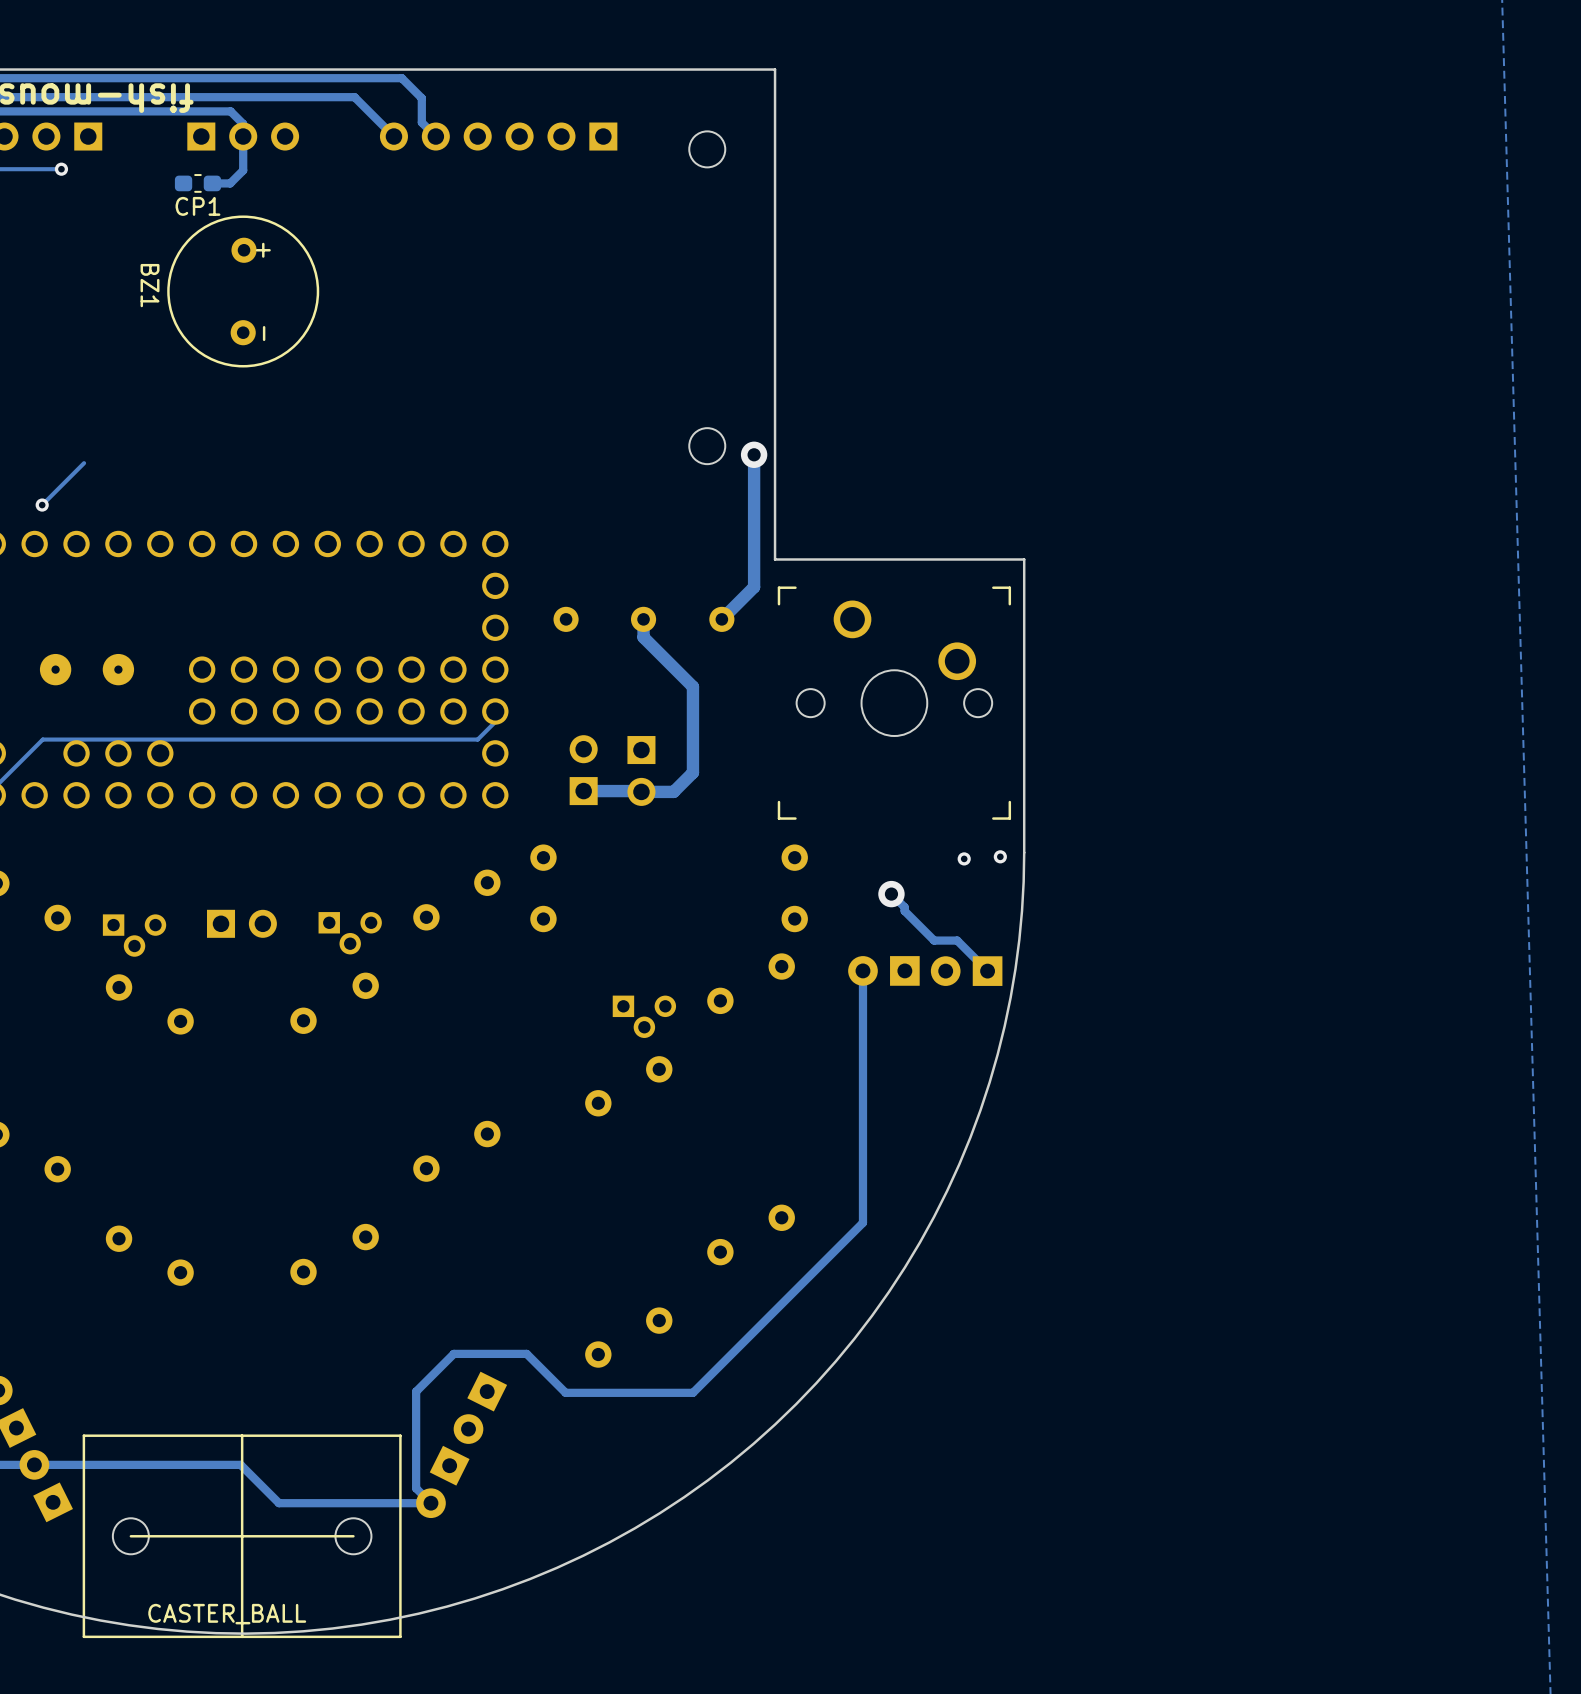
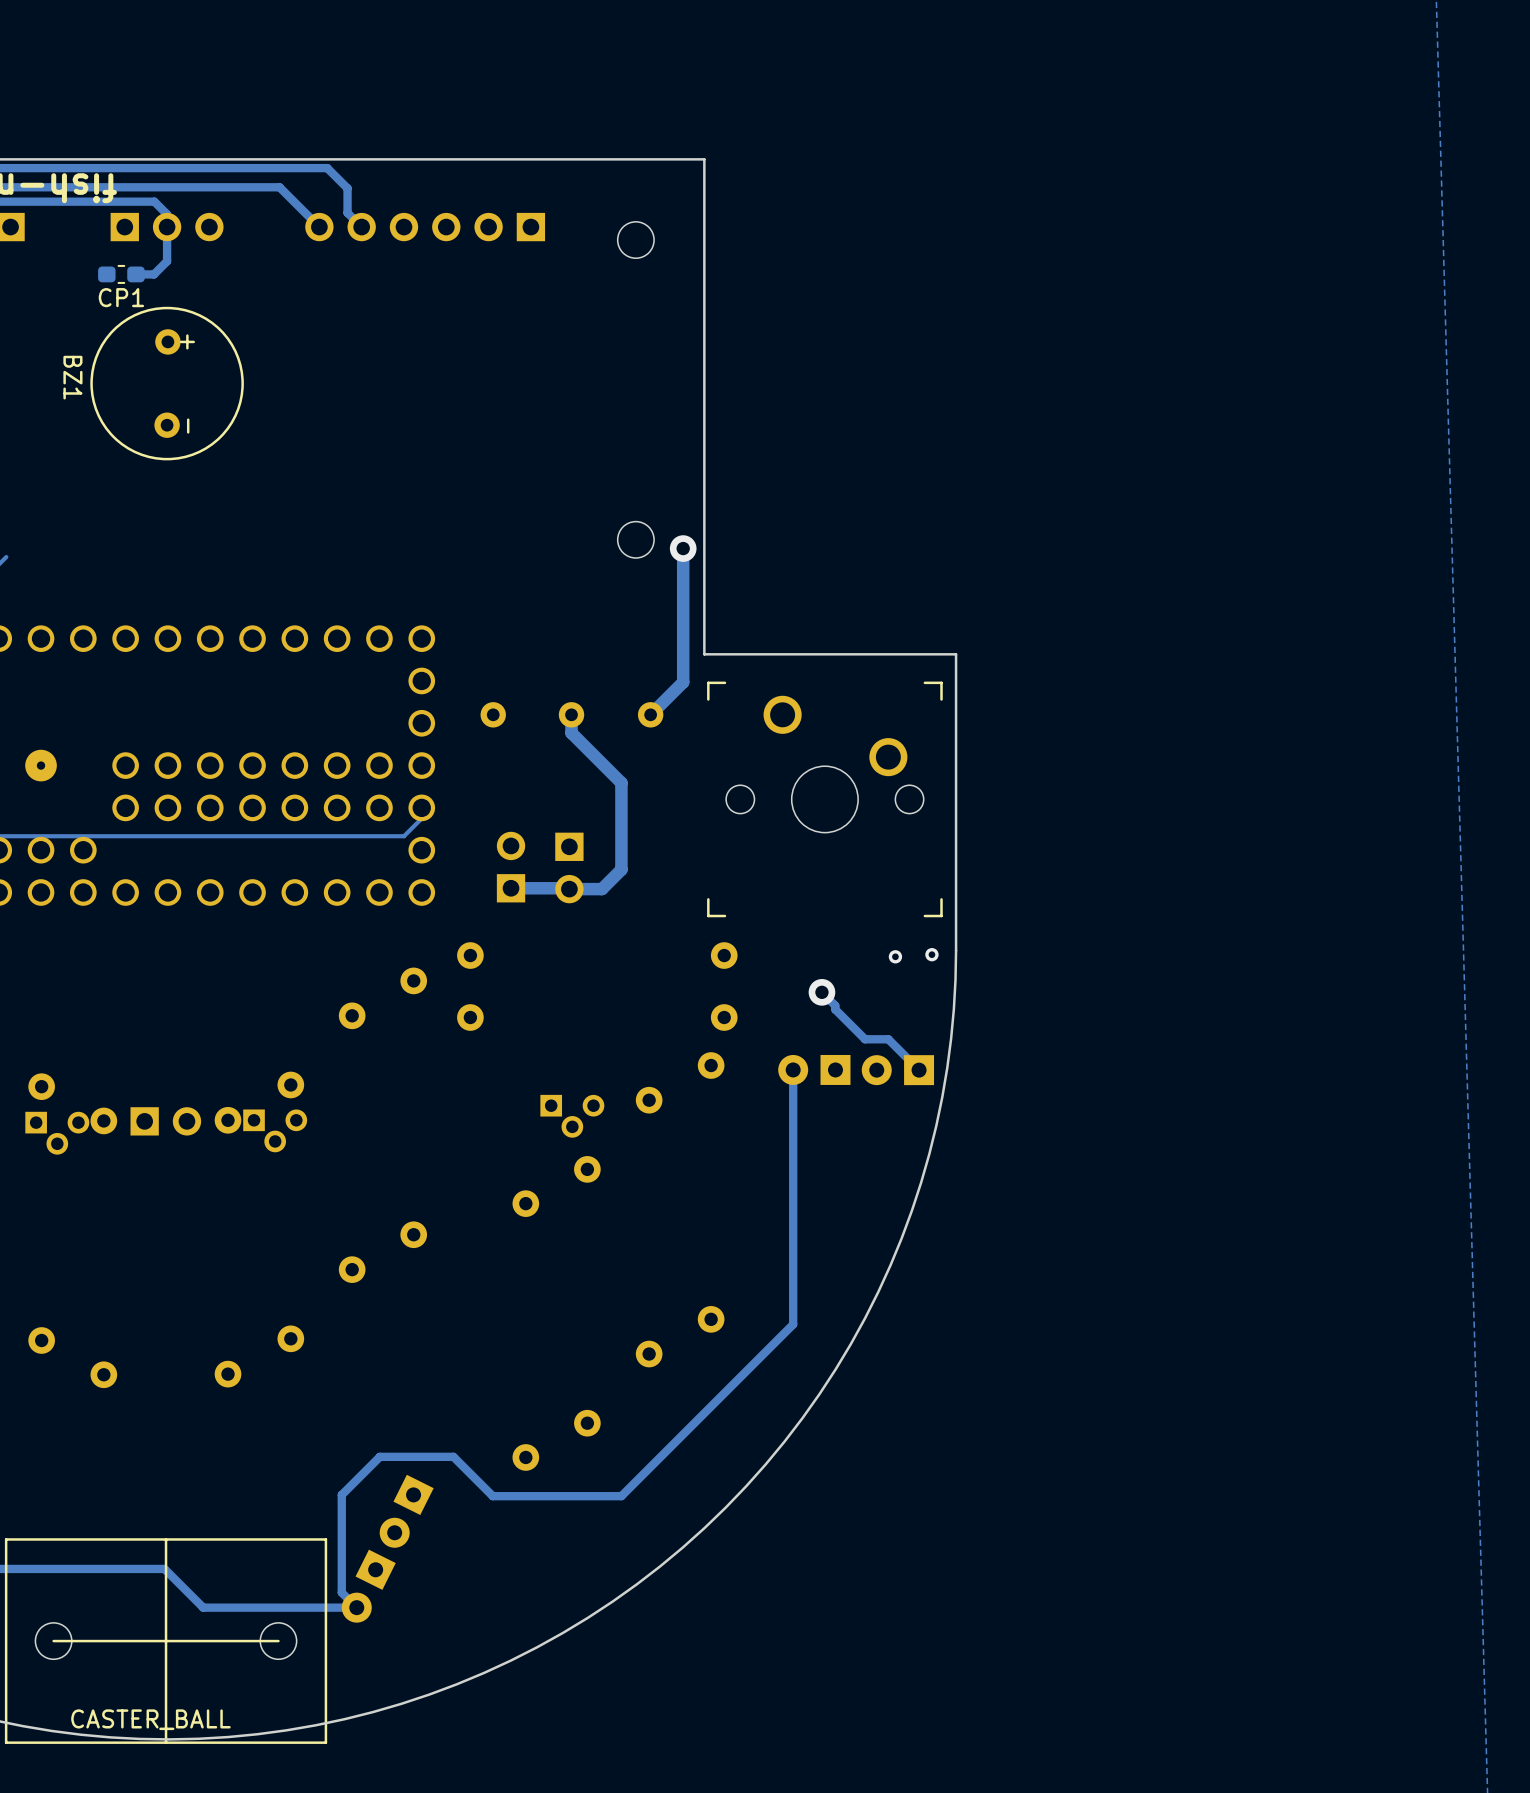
part position: (241, 923) -> (165, 1121)
part position: (350, 933) -> (275, 1130)
part position: (134, 935) -> (57, 1133)

